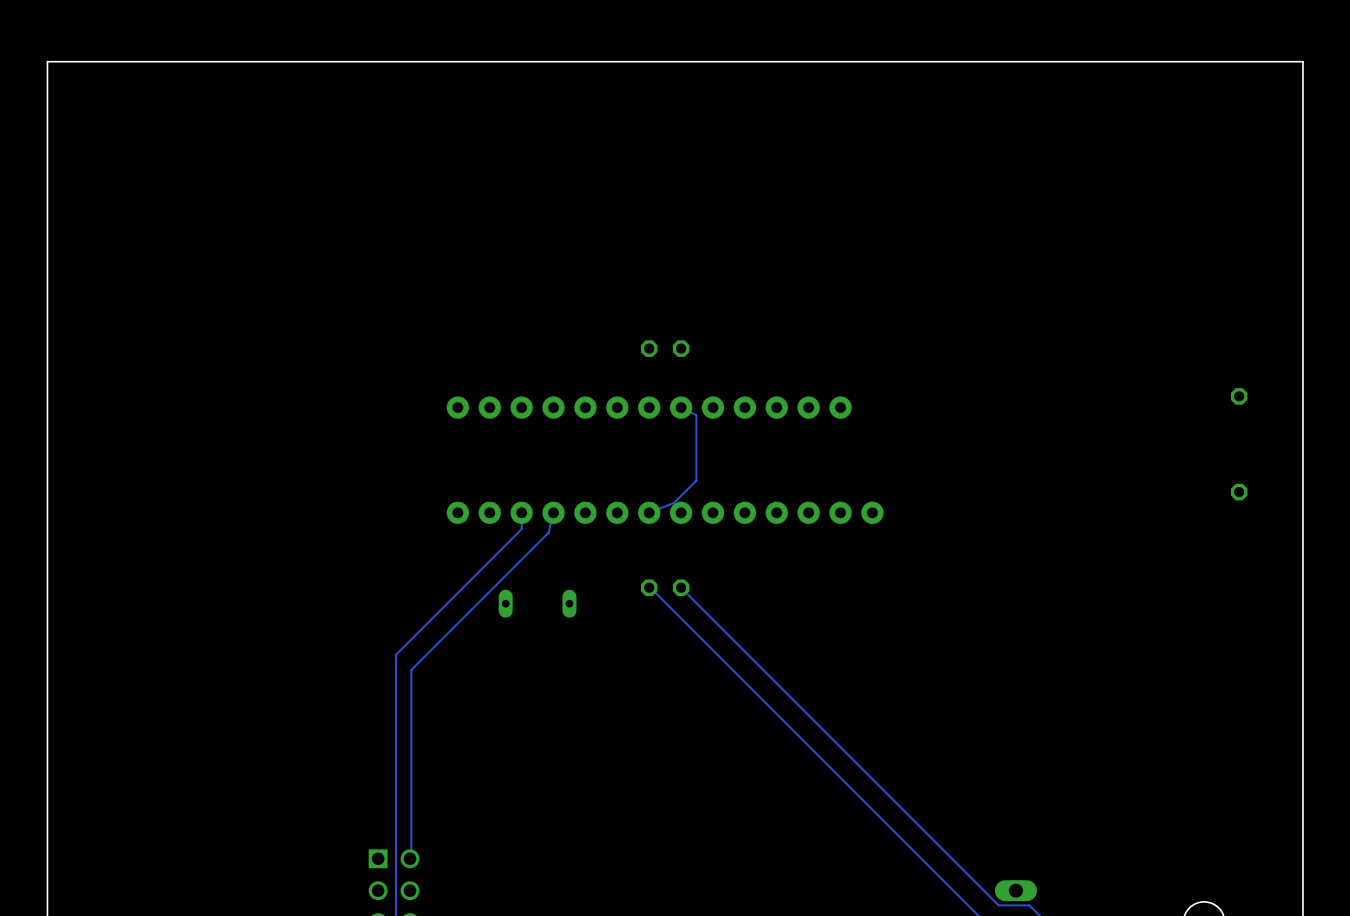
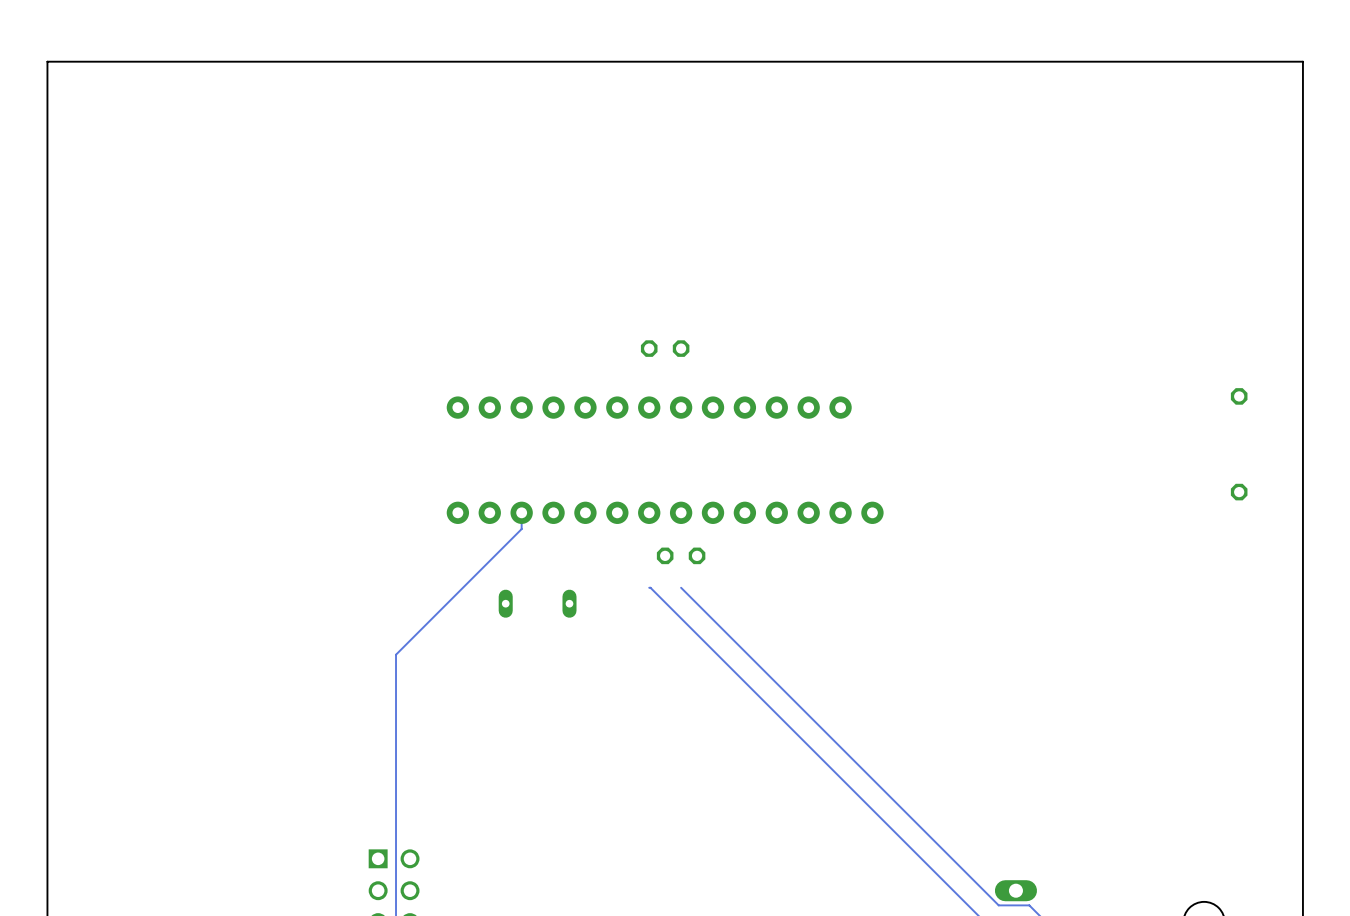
track: (681, 407) (696, 415) (696, 480) (674, 502) (649, 512) -> none
track: (553, 512) (548, 532) (411, 670) (410, 858) -> none
part position: (665, 587) -> (681, 555)

